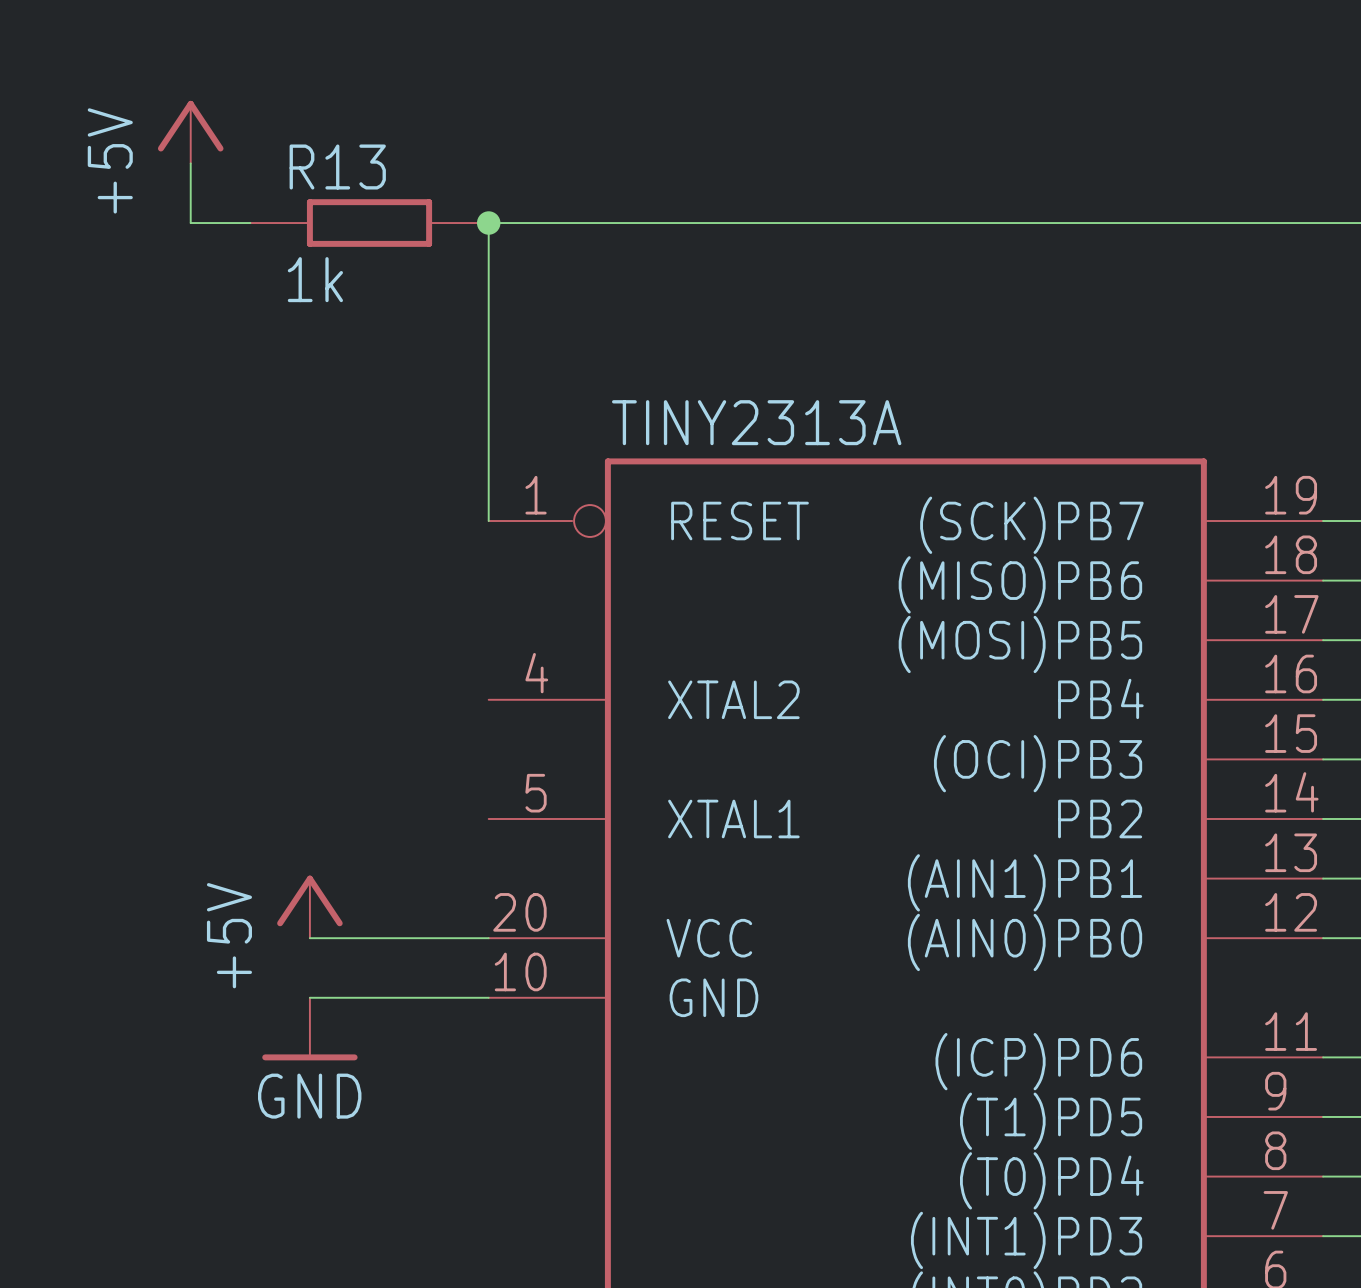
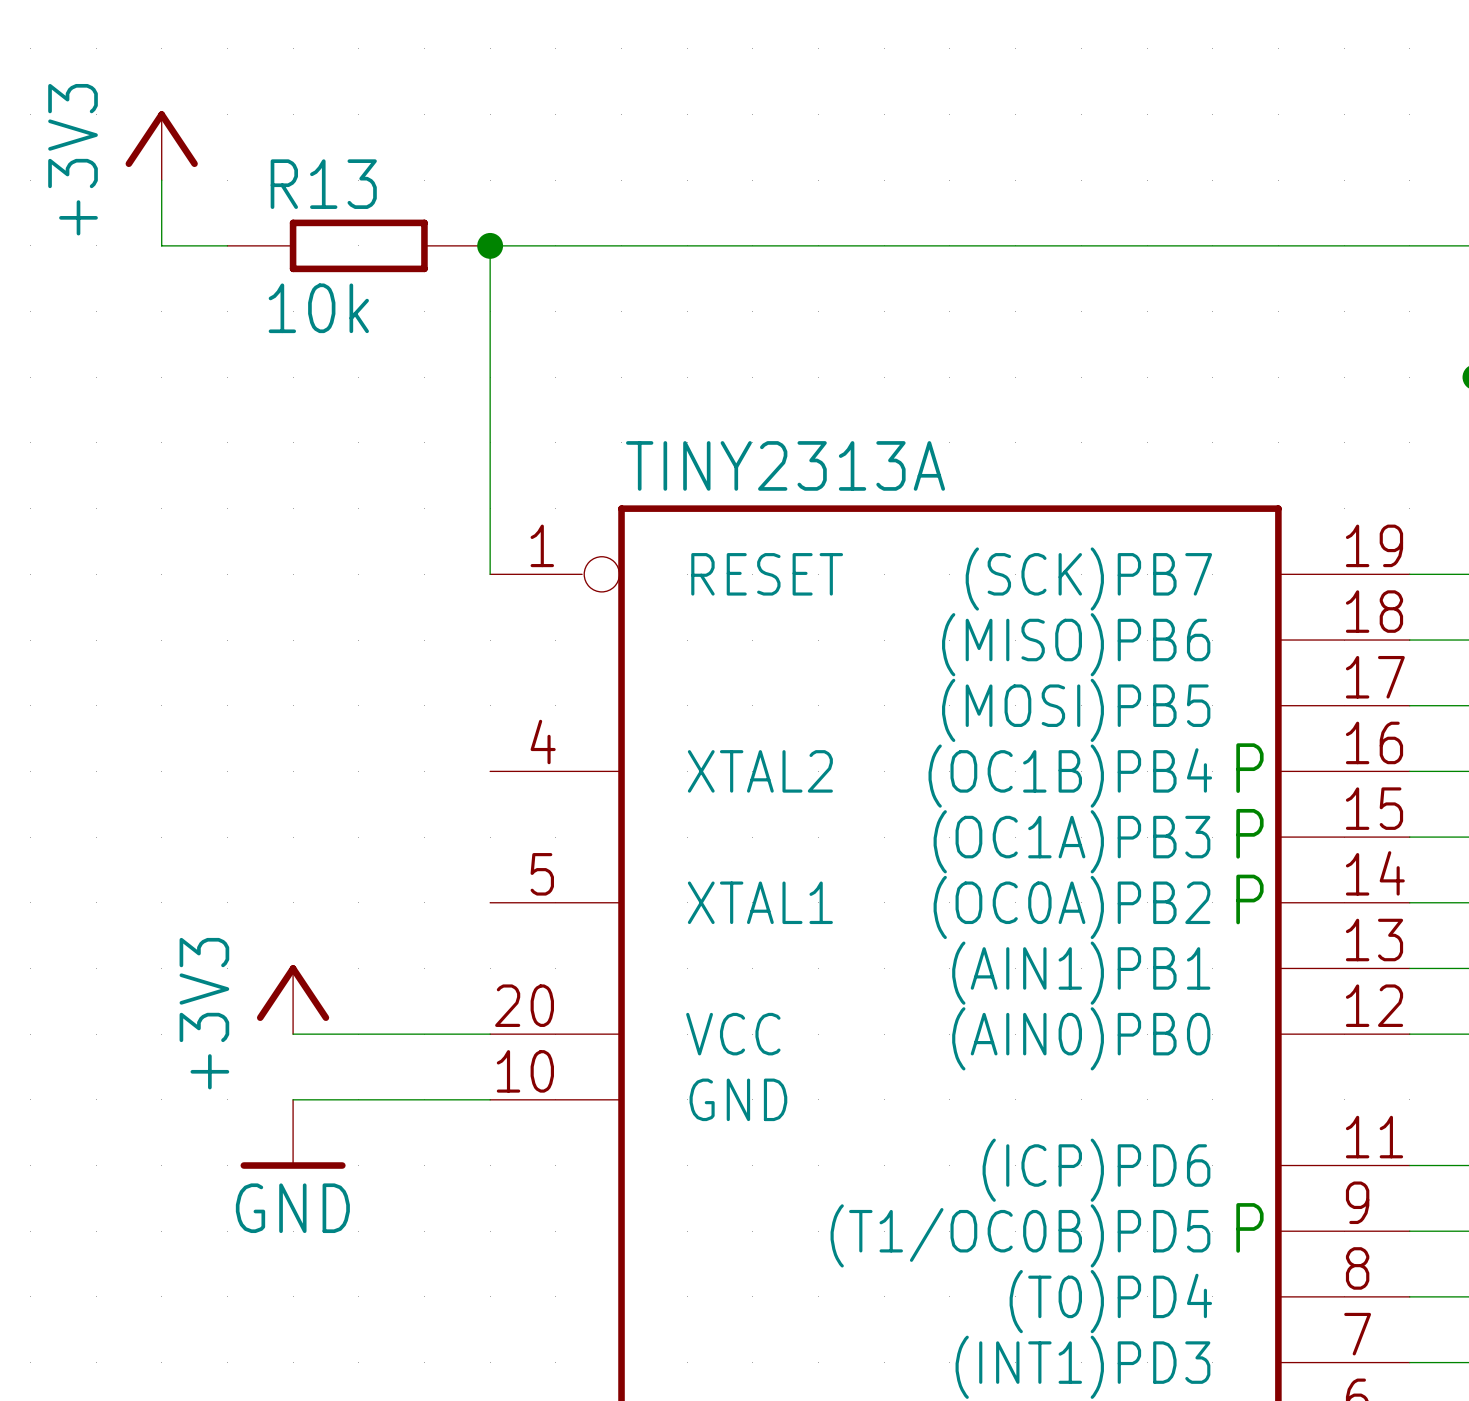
power symbol: +5V (190, 132) -> +3V3 (161, 145)
R13 value: 1k (315, 279) -> 10k (318, 308)
text: none -> P (1249, 768)
TINY2313A pin name: PB4 (1100, 698) -> (OC1B)PB4 (1070, 776)
text: none -> P (1249, 833)
TINY2313A pin name: (OCI)PB3 (1038, 763) -> (OC1A)PB3 (1071, 841)
text: none -> P (1249, 899)
TINY2313A pin name: PB2 (1100, 818) -> (OC0A)PB2 (1071, 907)
power symbol: +5V (309, 906) -> +3V3 (293, 999)
text: none -> P (1249, 1227)
TINY2313A pin name: (T1)PD5 (1051, 1121) -> (T1/OC0B)PD5 (1020, 1235)

